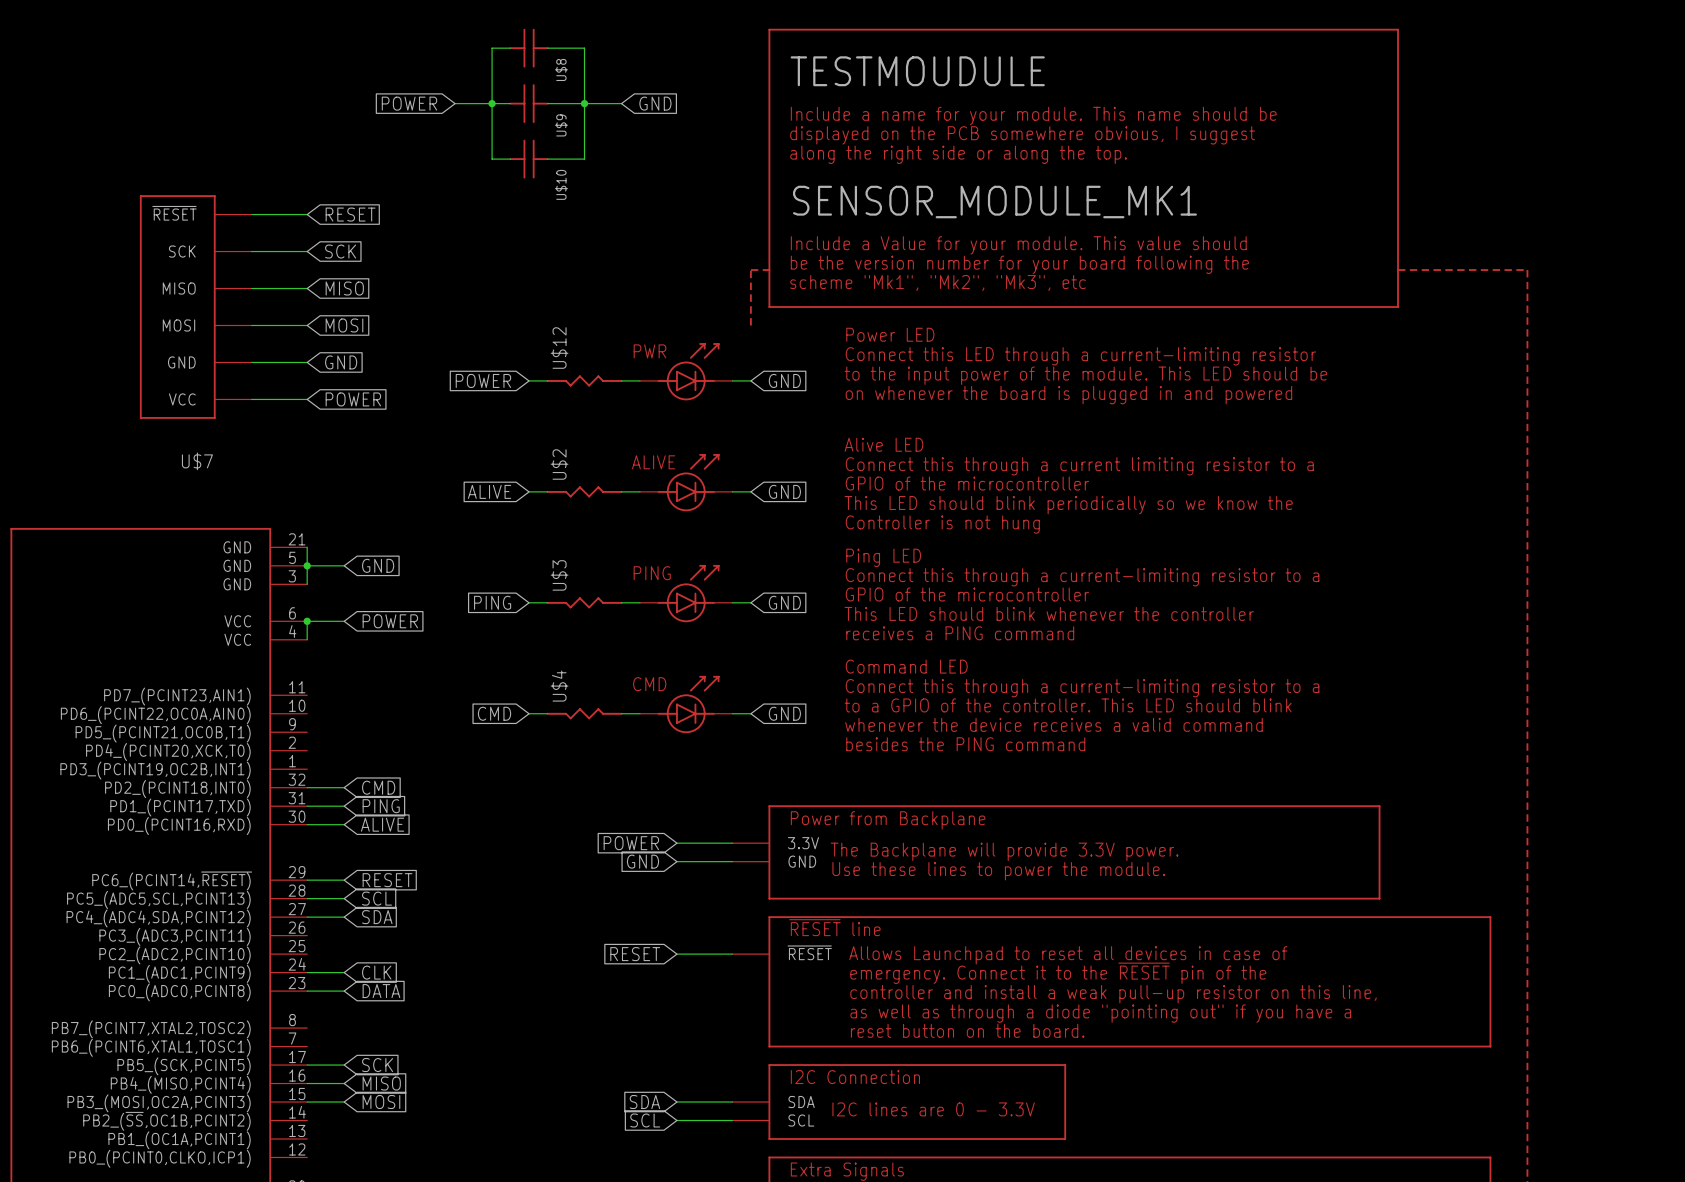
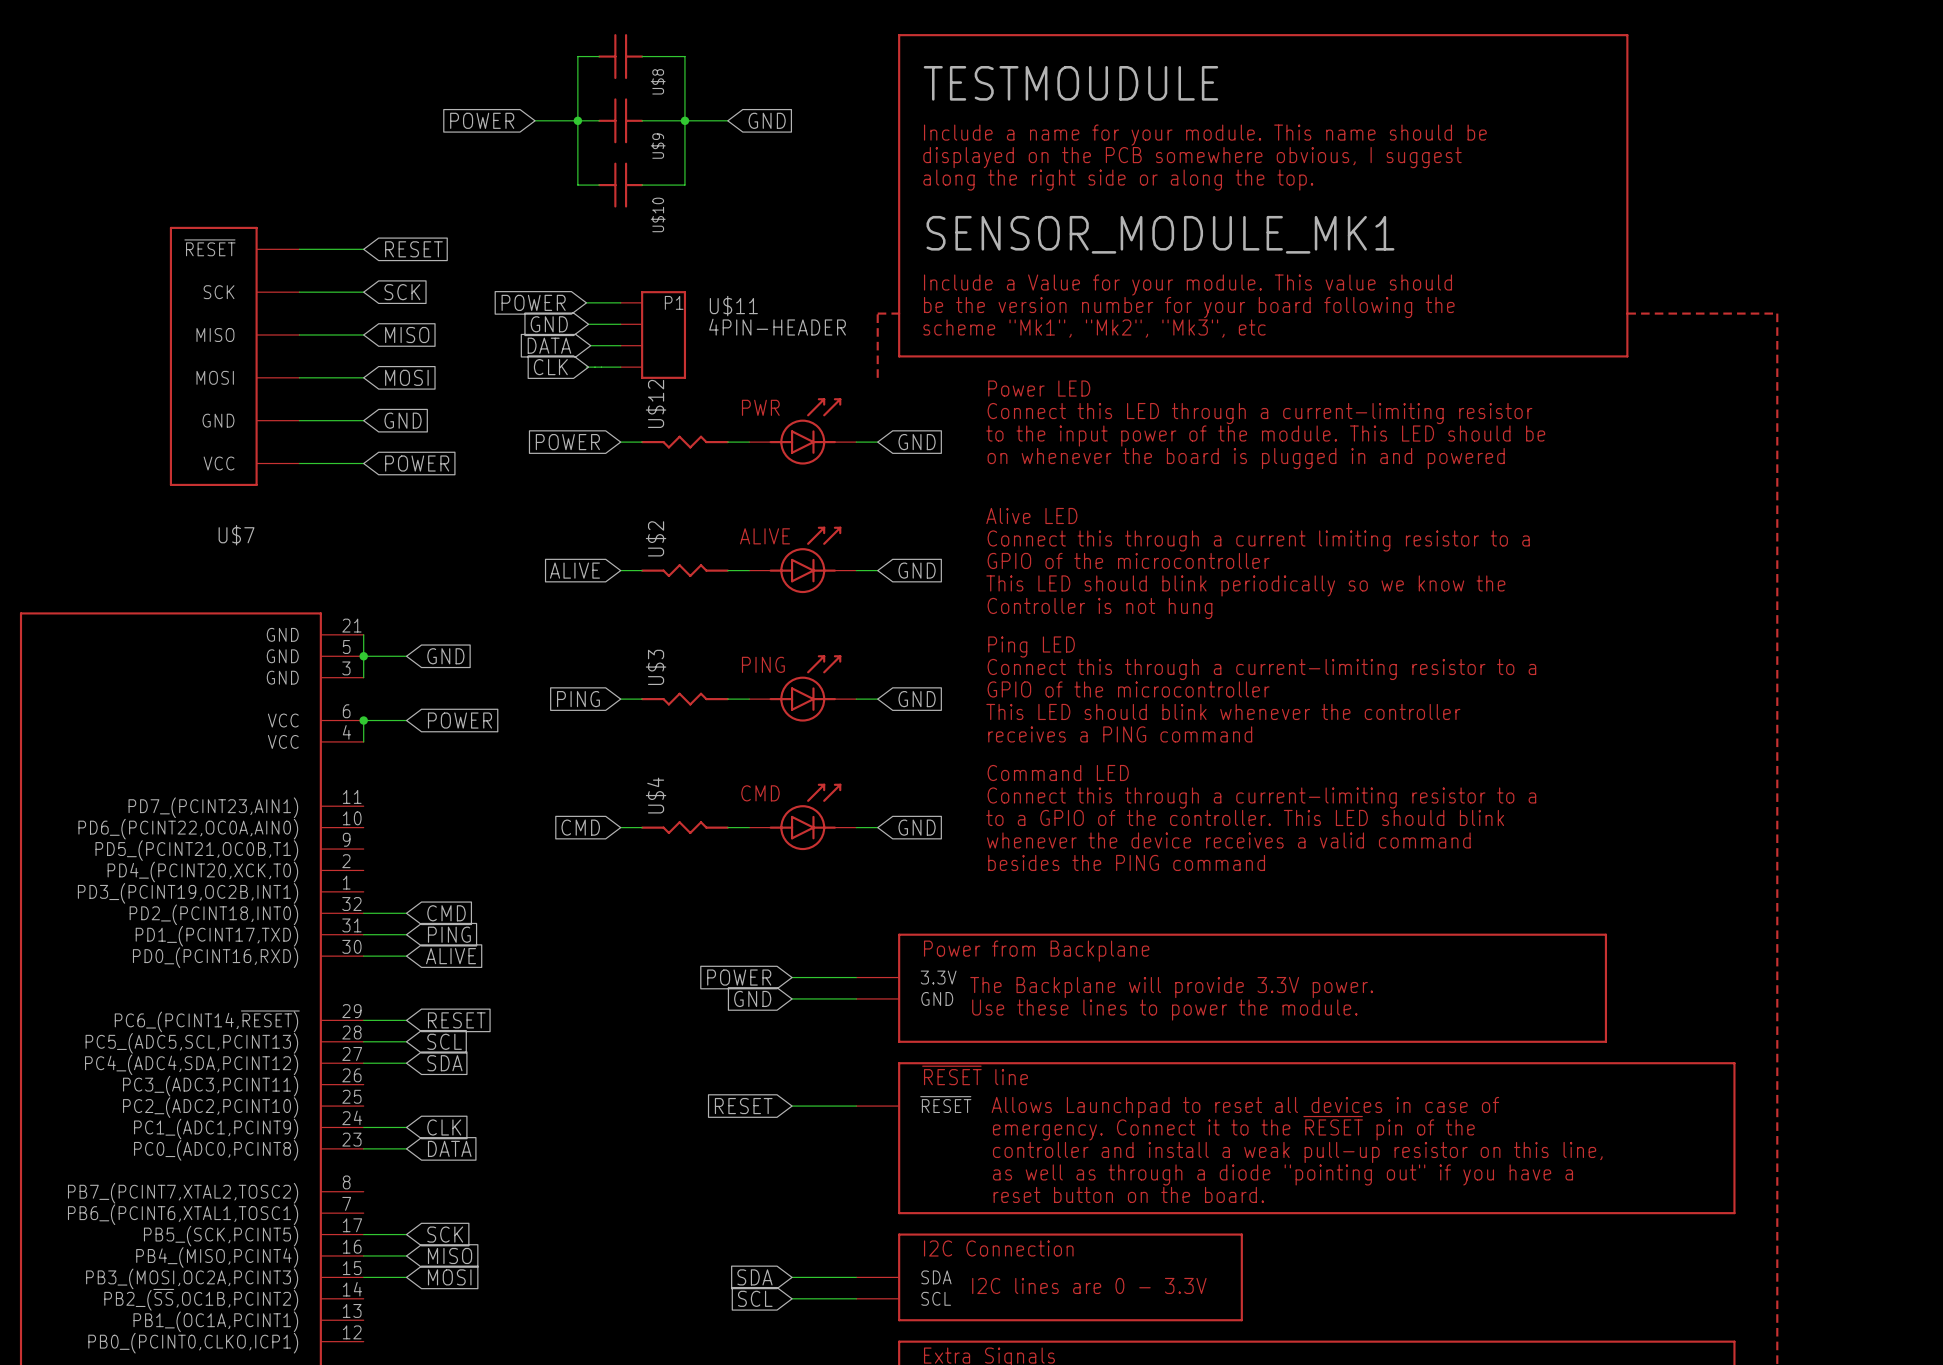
global label: none -> POWER (533, 302)
wire: none -> (586, 302) (620, 302)
global label: none -> GND (549, 324)
wire: none -> (588, 324) (620, 324)
U$11: none -> 4PIN-HEADER (653, 335)
global label: none -> DATA (549, 345)
wire: none -> (590, 345) (620, 345)
global label: none -> CLK (550, 367)
wire: none -> (586, 367) (620, 367)

